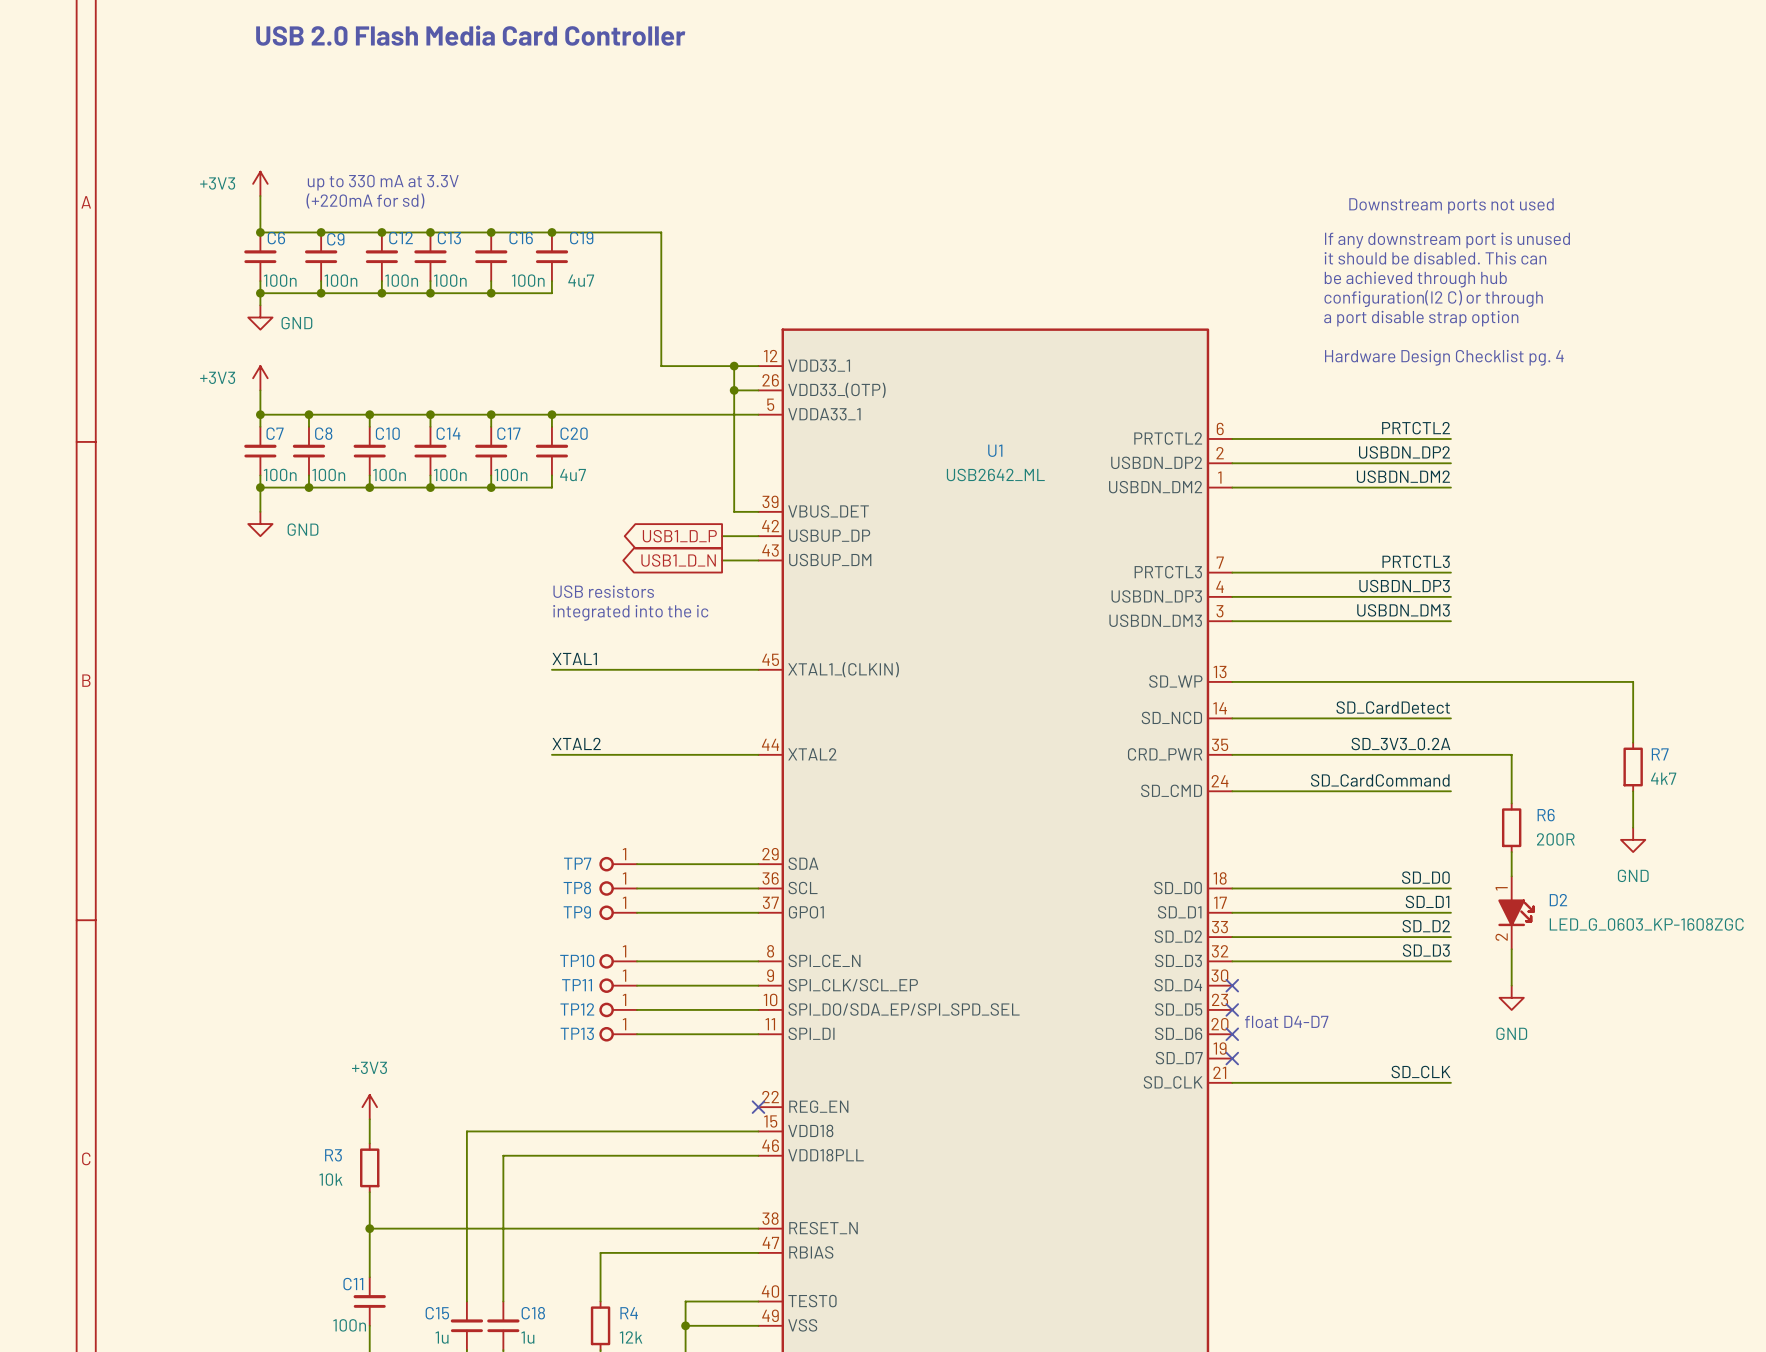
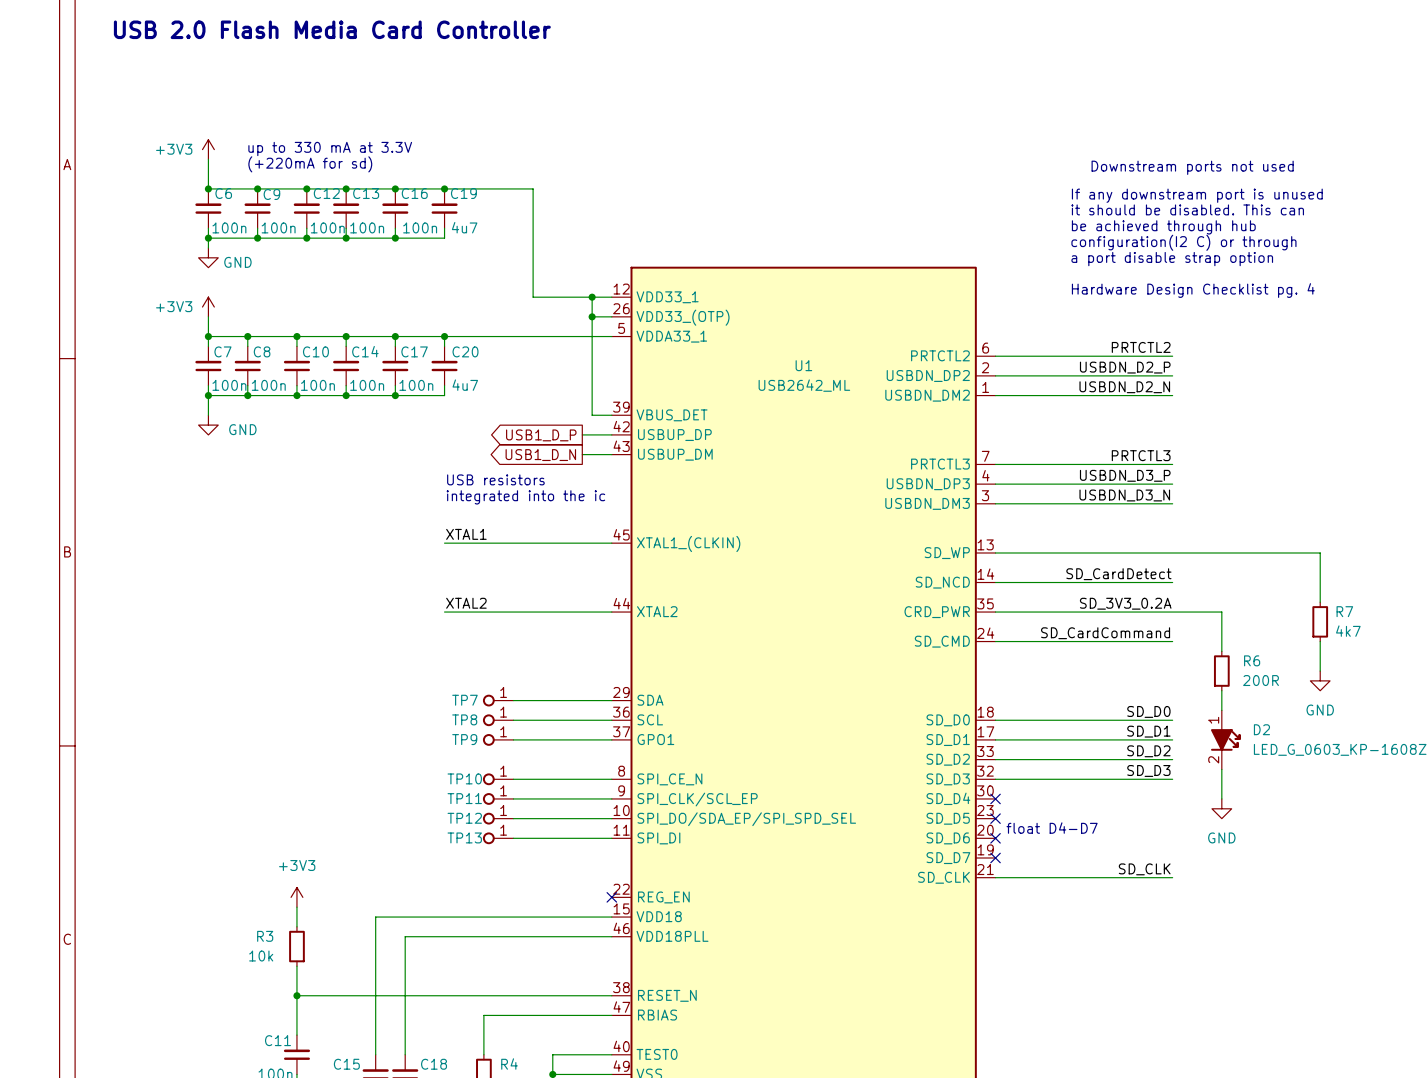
label: USBDN_DP2 (1404, 452) -> USBDN_D2_P (1125, 367)
label: USBDN_DM2 (1403, 476) -> USBDN_D2_N (1124, 387)
label: USBDN_DP3 (1404, 586) -> USBDN_D3_P (1125, 475)
label: USBDN_DM3 (1403, 610) -> USBDN_D3_N (1124, 495)

